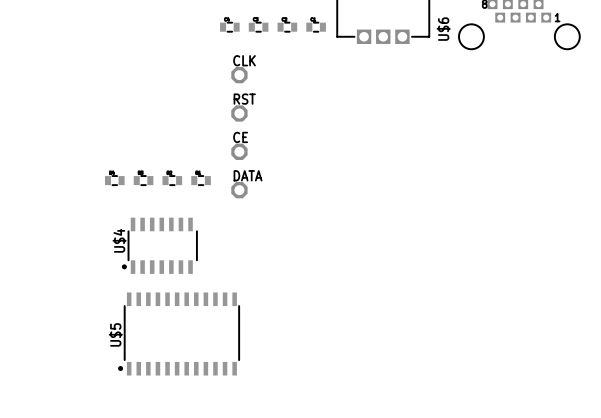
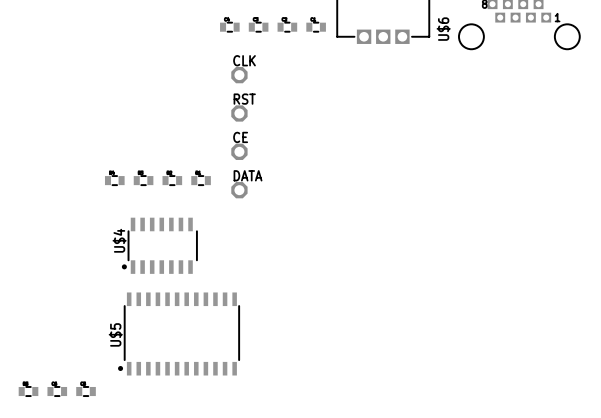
part: none -> (28, 391)
part: none -> (57, 391)
part: none -> (86, 391)

